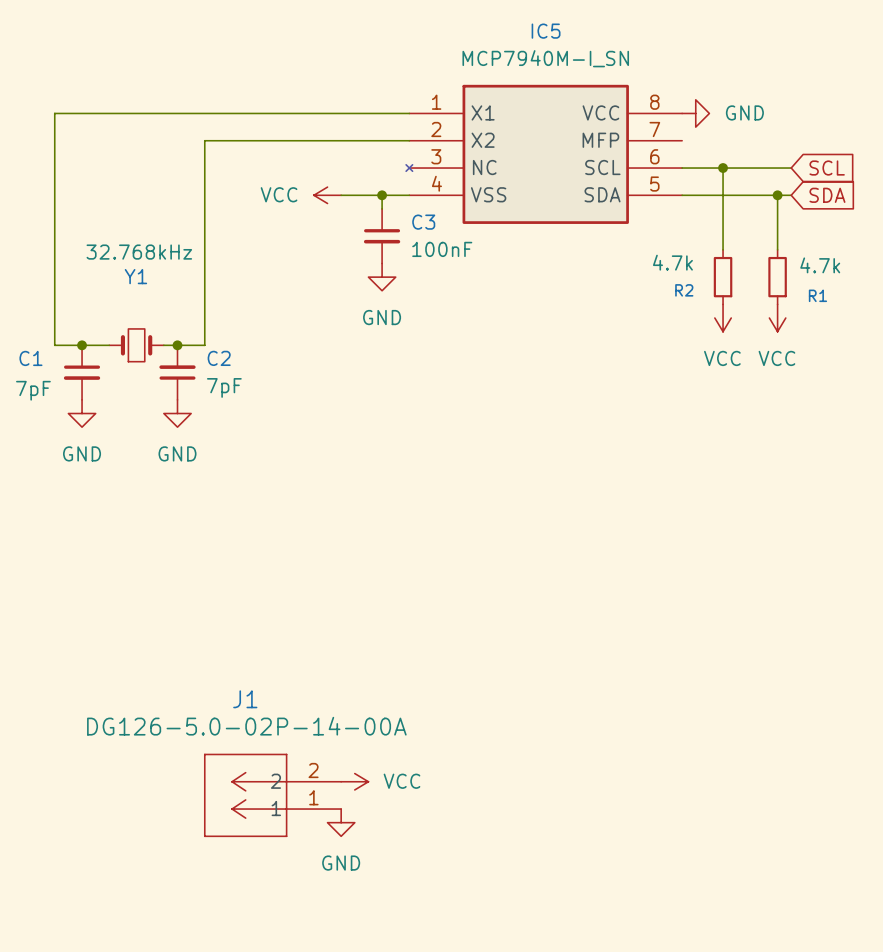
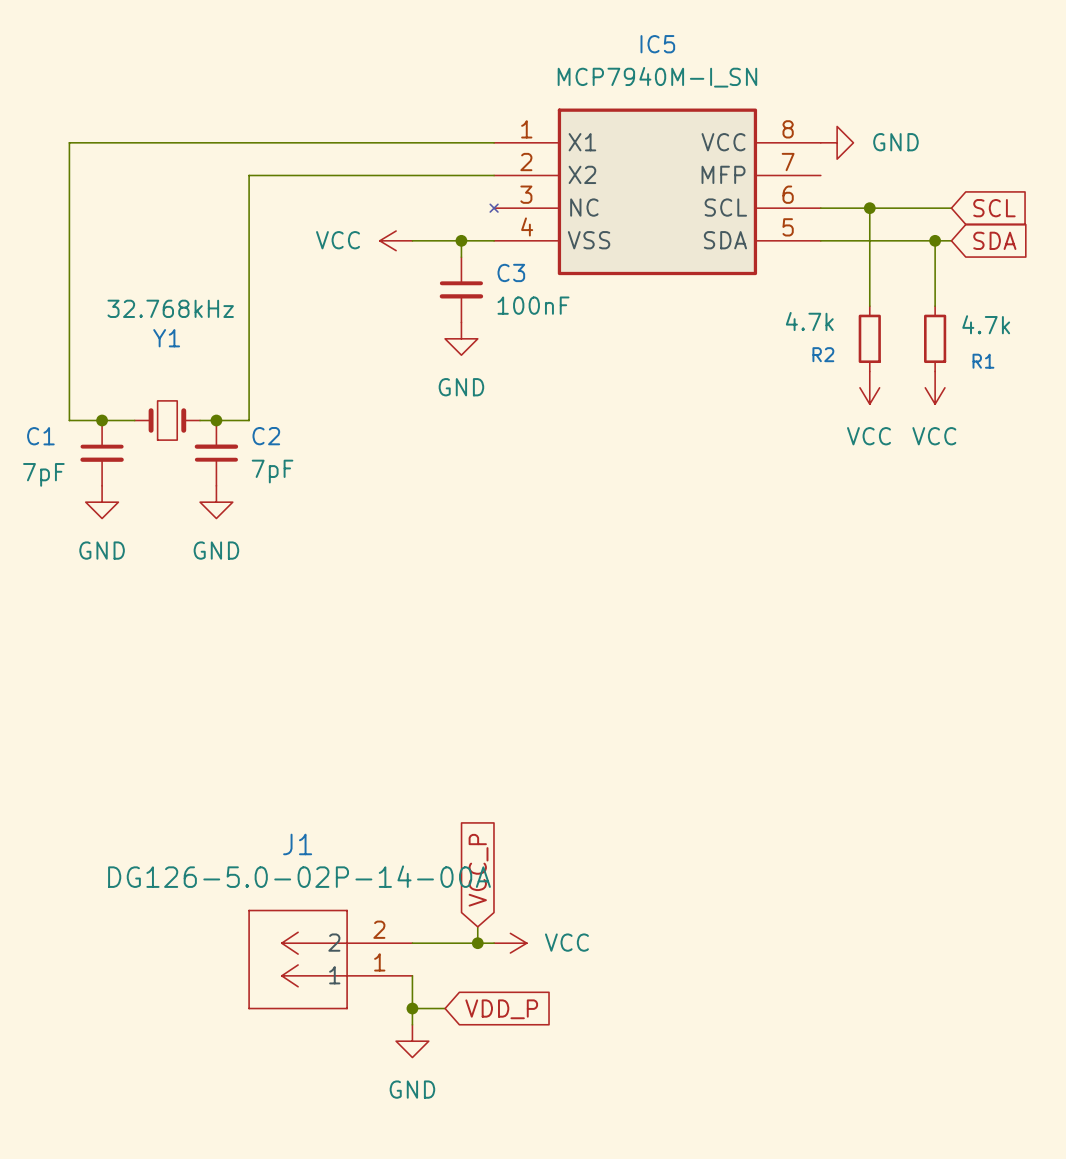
global label: none -> VCC_P (478, 870)
wire: none -> (477, 926) (477, 943)
wire: none -> (412, 943) (494, 943)
power symbol position: VCC (354, 781) -> VCC (510, 943)
junction: none -> (477, 943)
wire: none -> (412, 975) (412, 1024)
power symbol position: GND (341, 822) -> GND (412, 1041)
wire: none -> (412, 1008) (445, 1008)
junction: none -> (412, 1008)
global label: none -> VDD_P (501, 1009)

